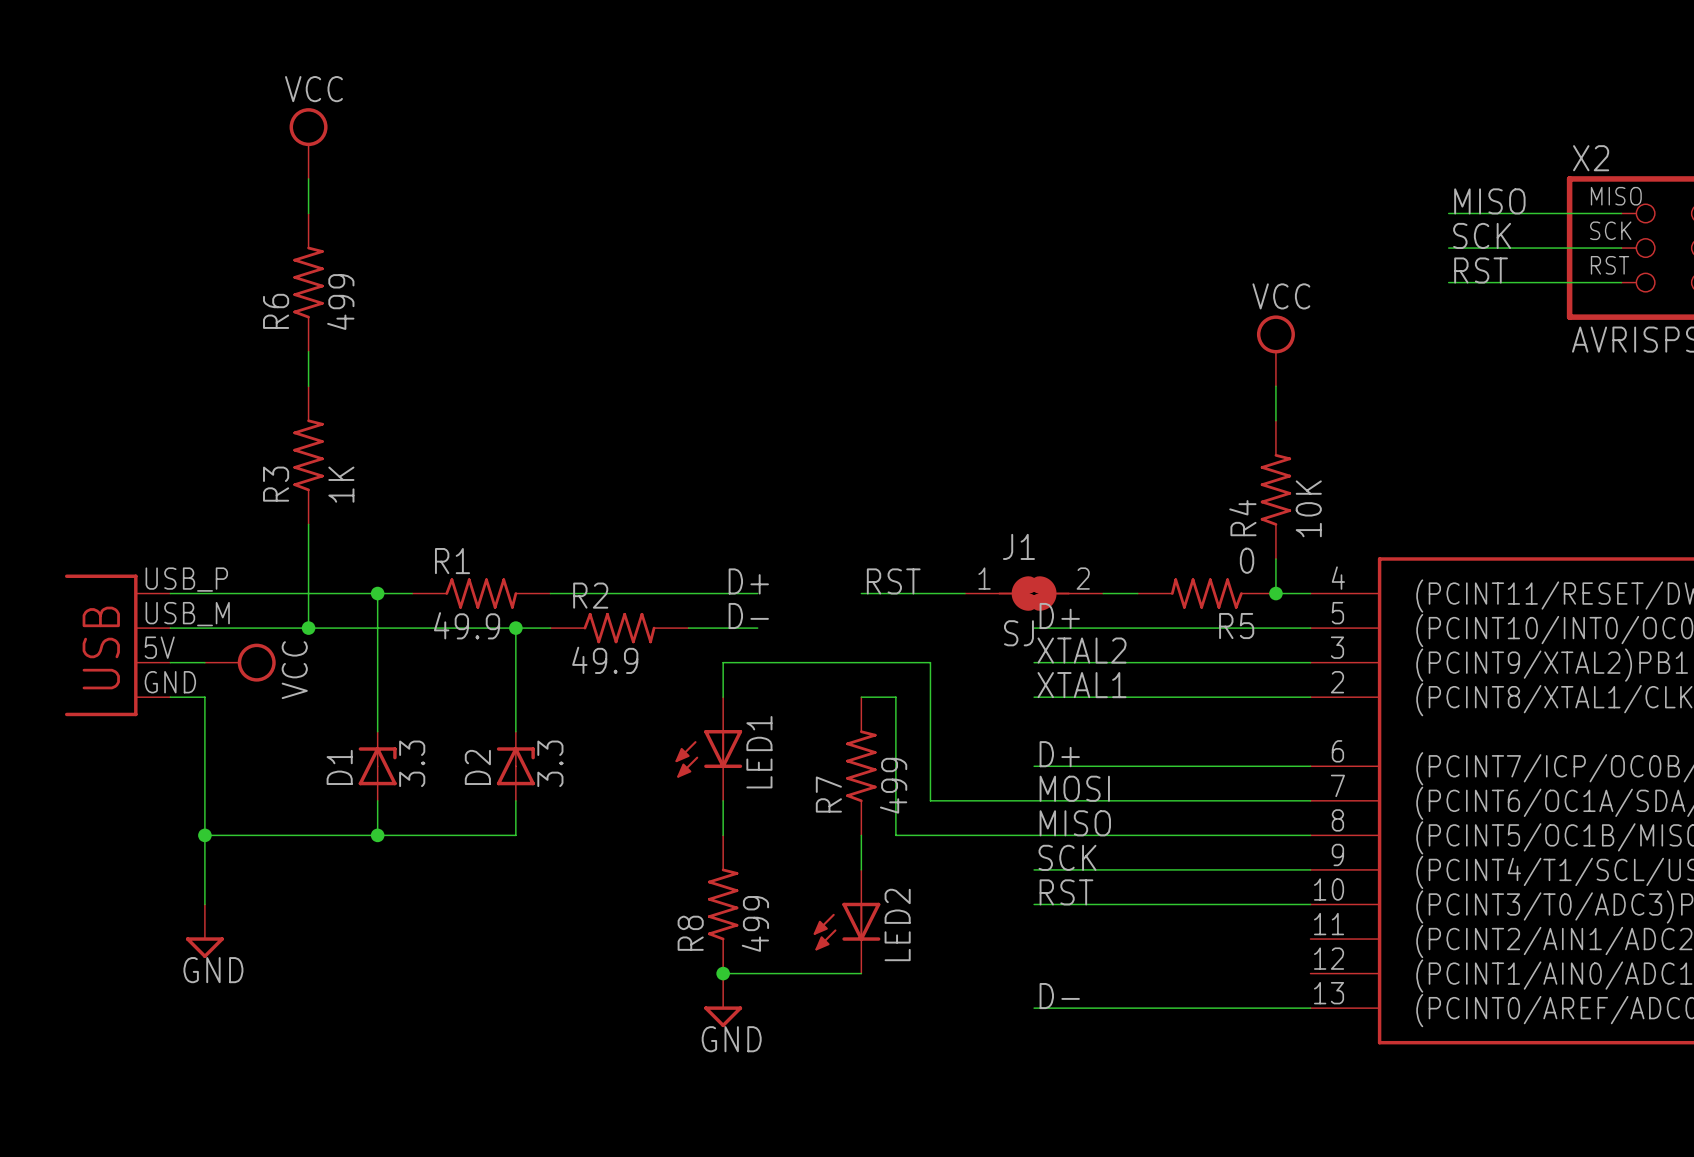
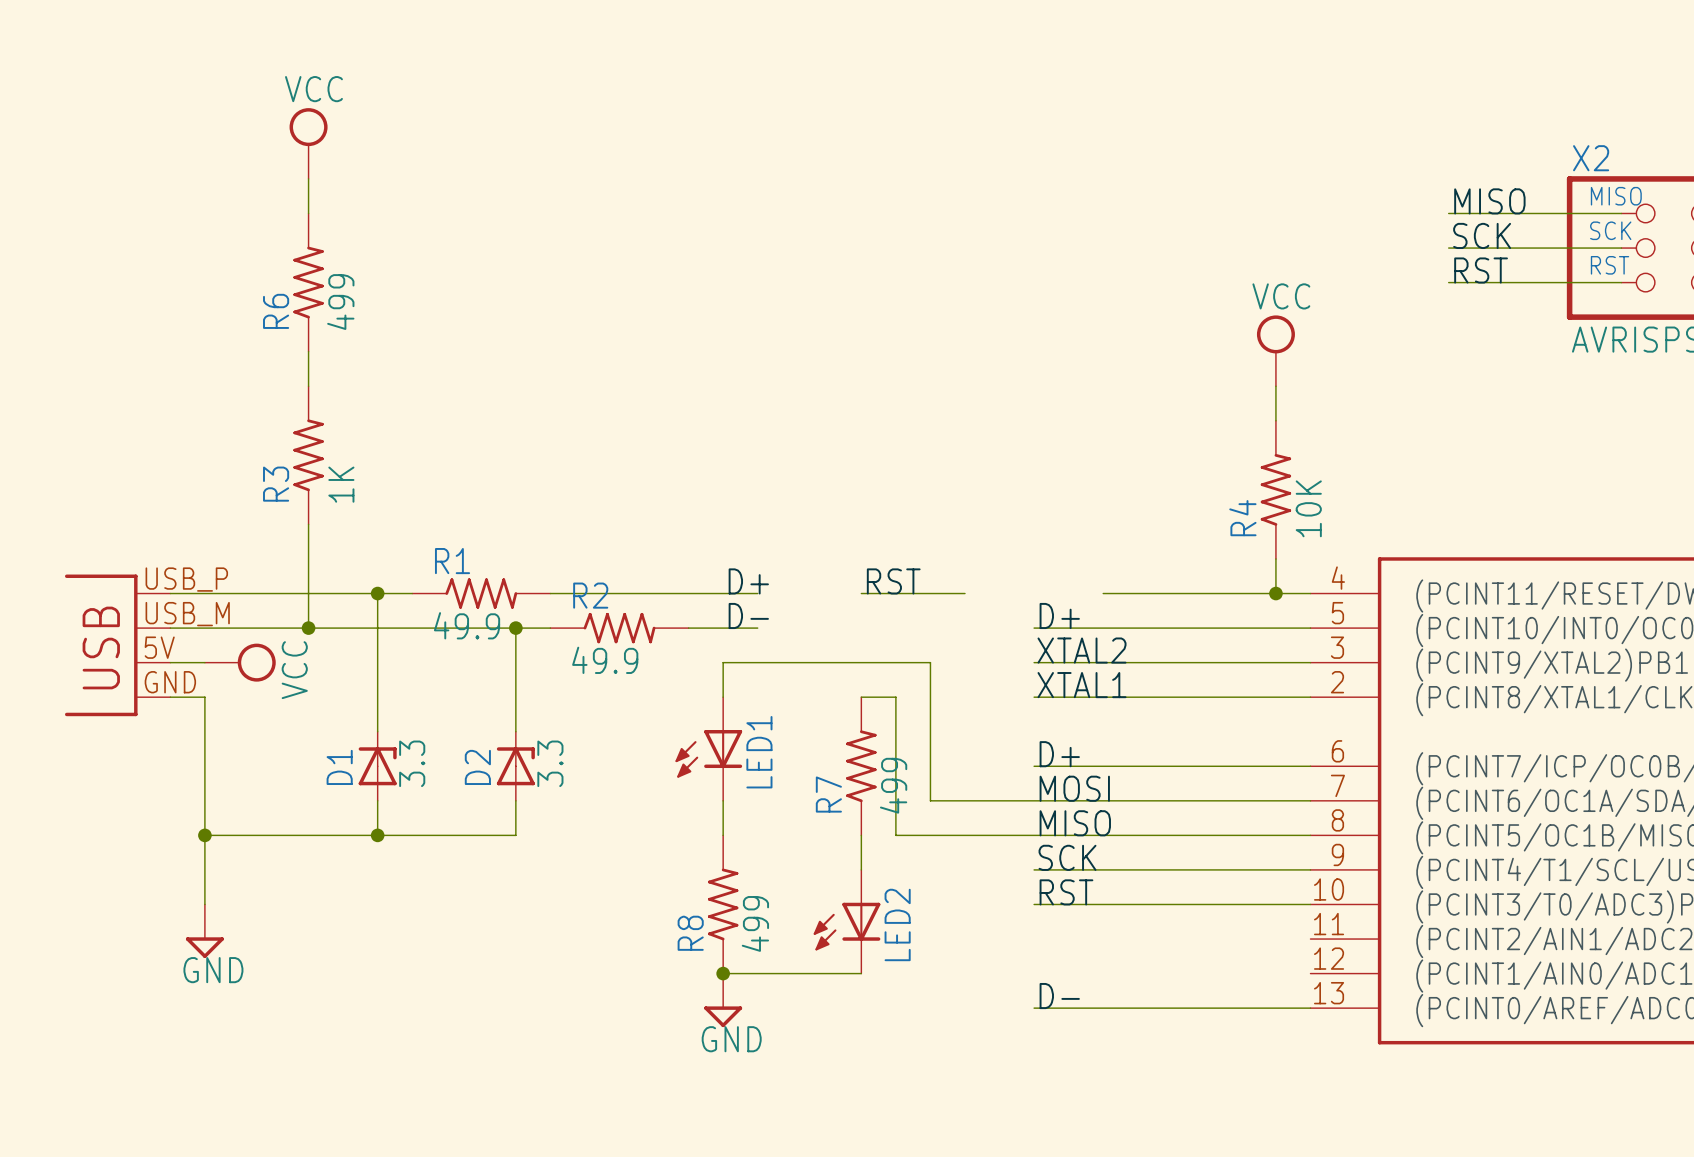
J1: SJ (1034, 593) -> none
R5: 0 (1206, 593) -> none

